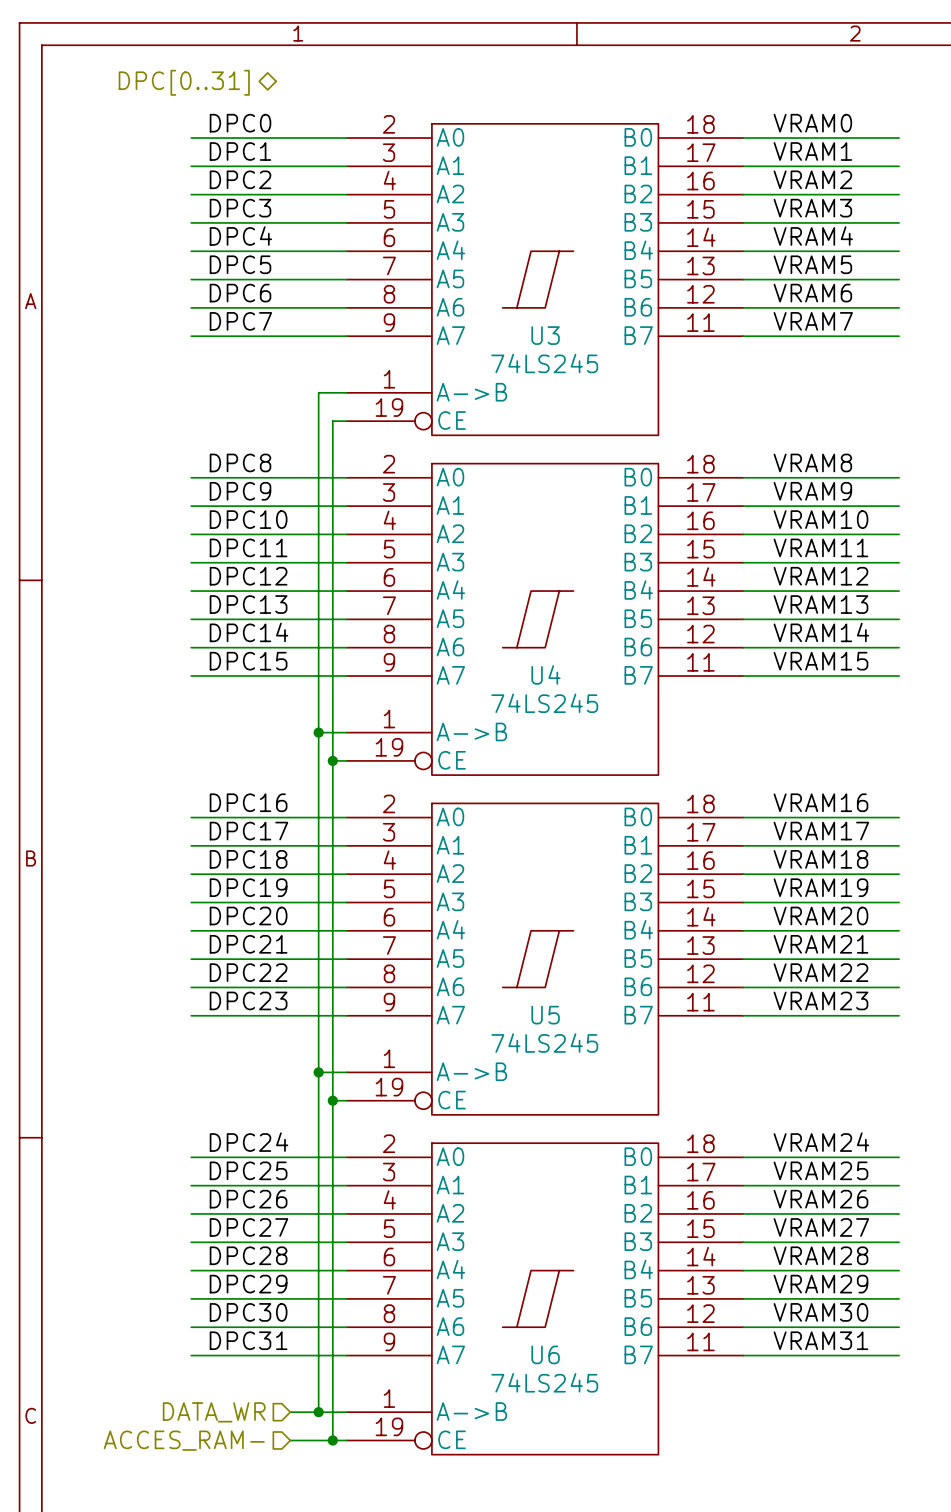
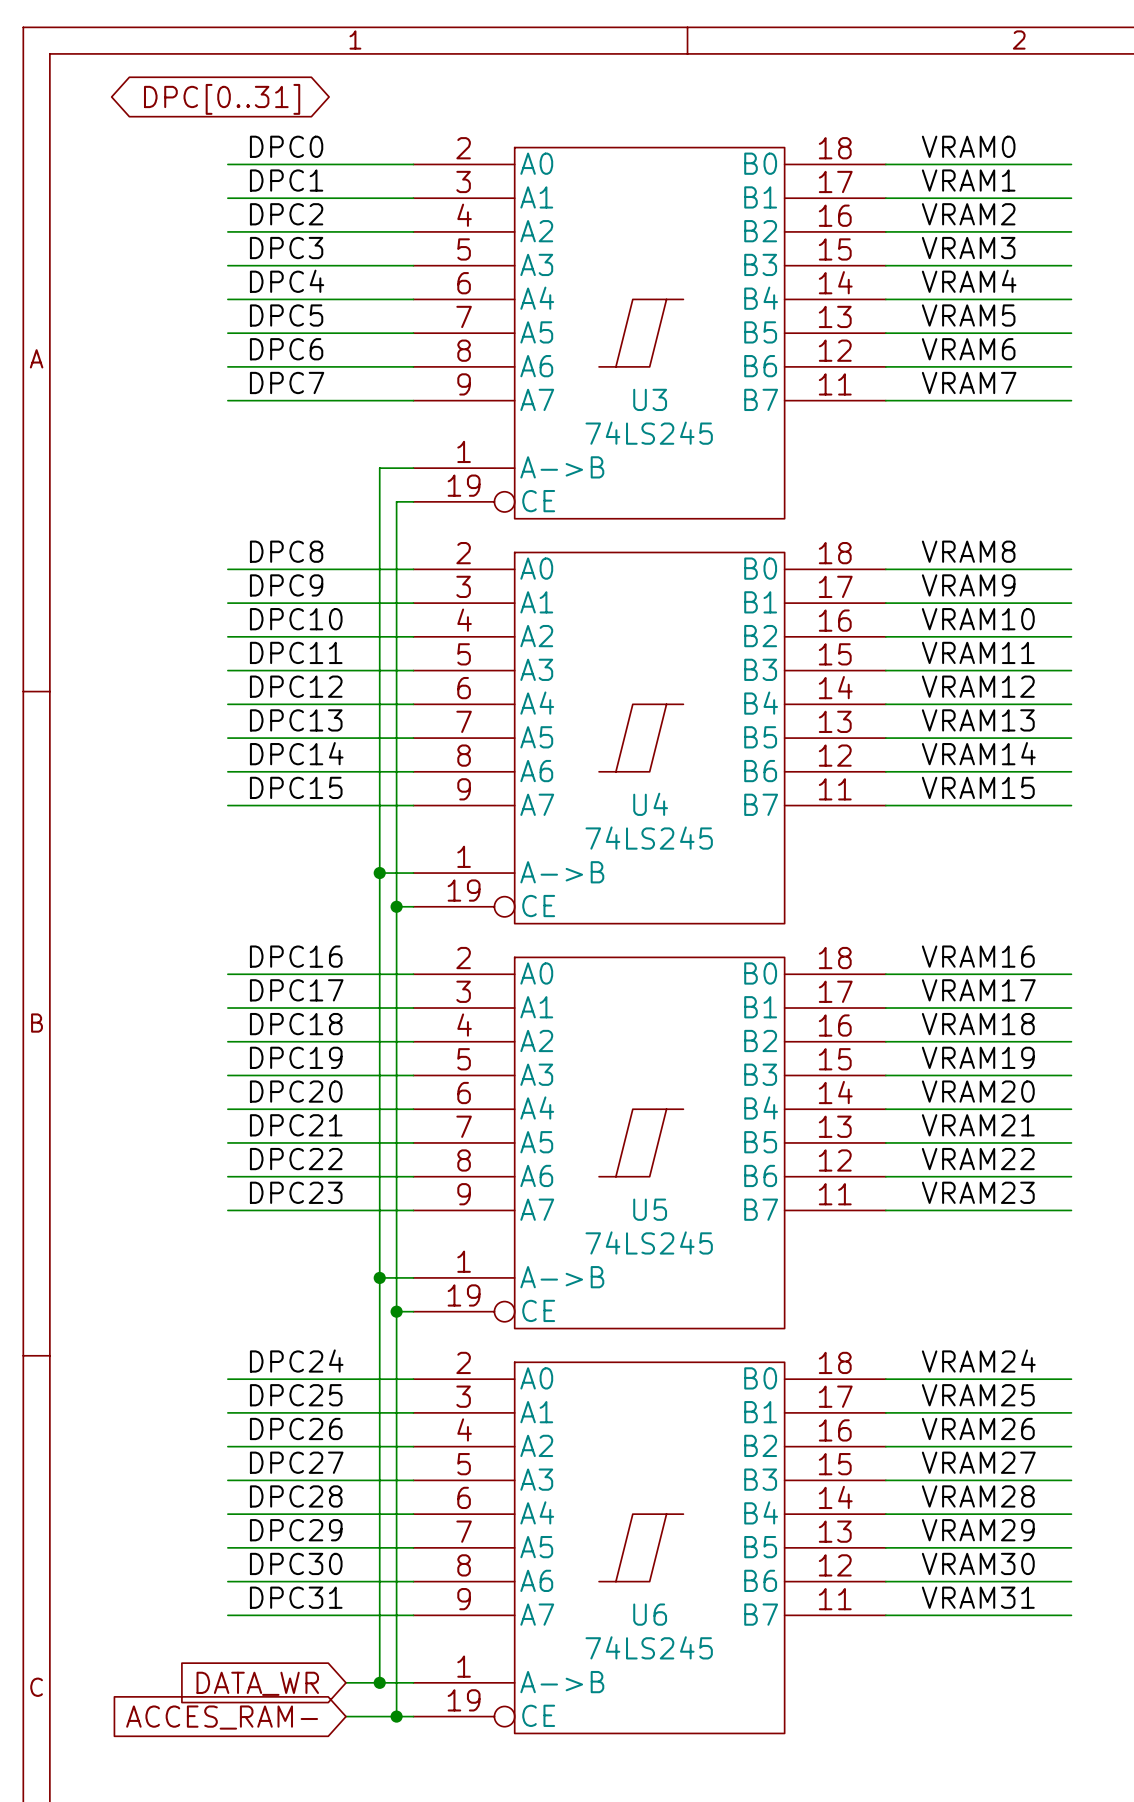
hierarchical label: DPC[0..31] (184, 82) -> none
global label: none -> DPC[0..31] (222, 99)
hierarchical label: DATA_WR (214, 1412) -> none
global label: none -> DATA_WR (257, 1683)
hierarchical label: ACCES_RAM- (184, 1440) -> none
global label: none -> ACCES_RAM- (222, 1717)

